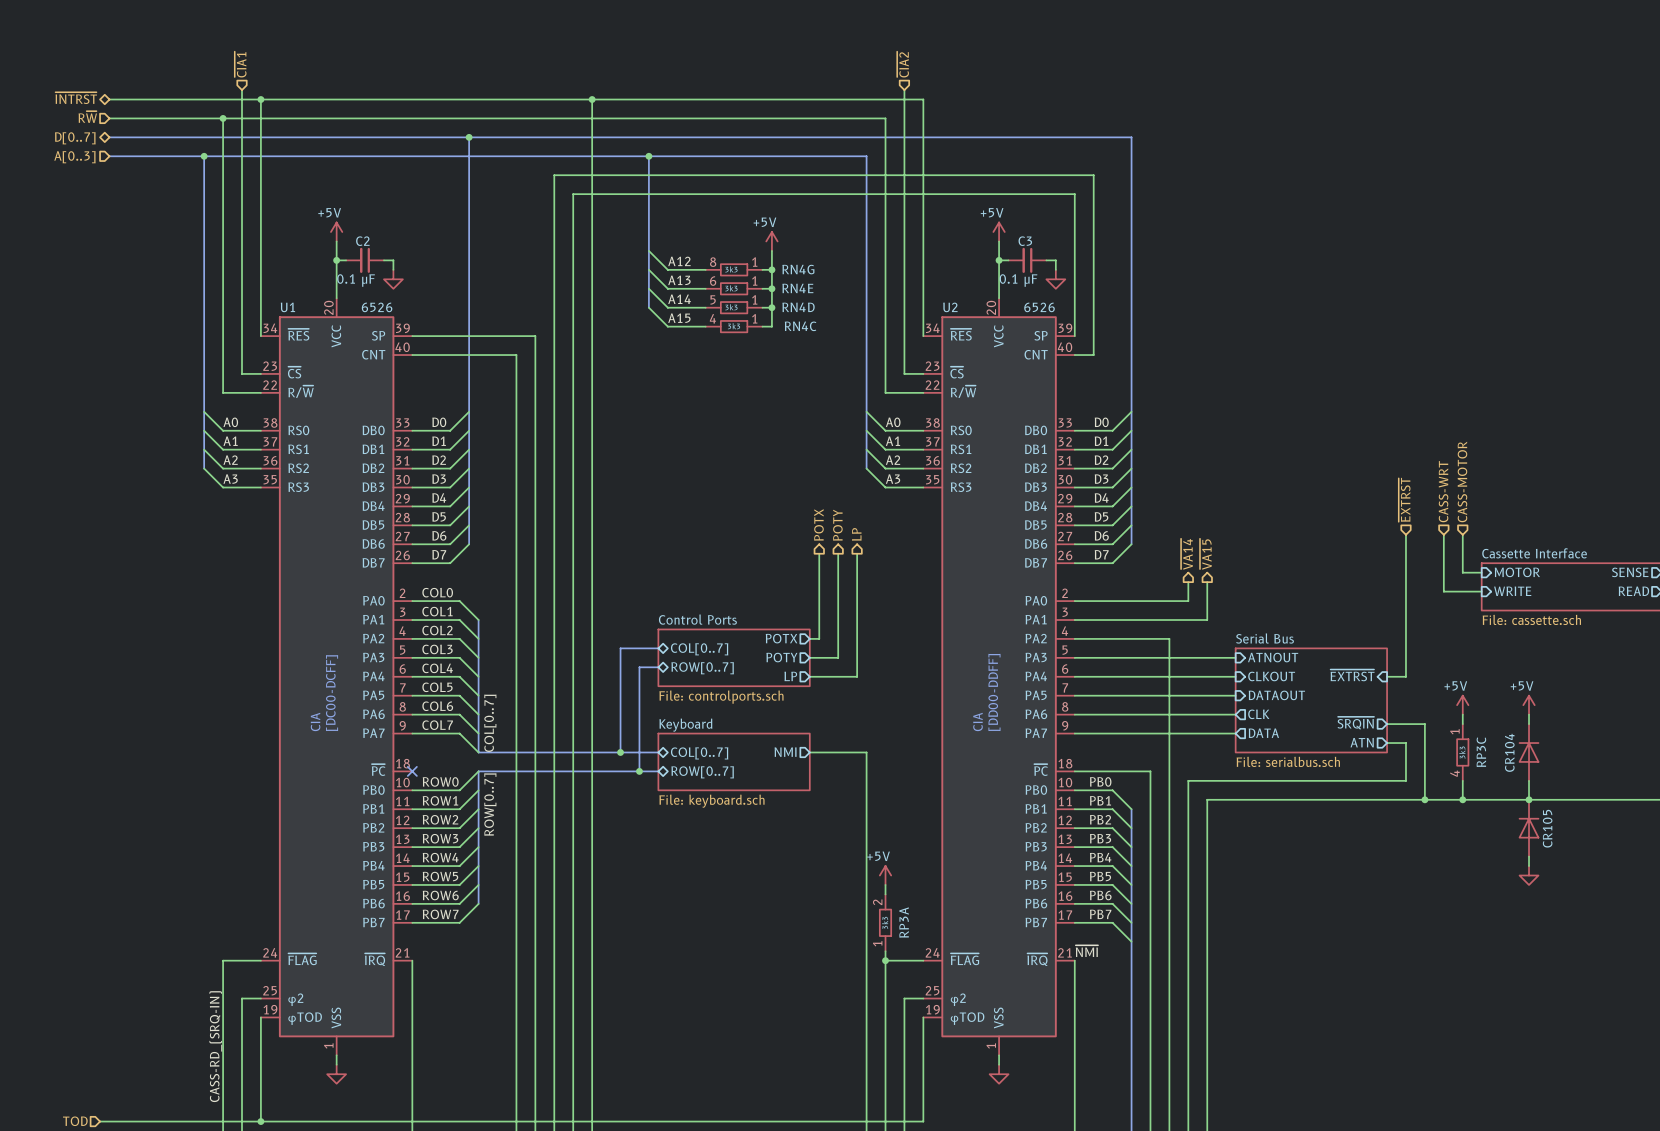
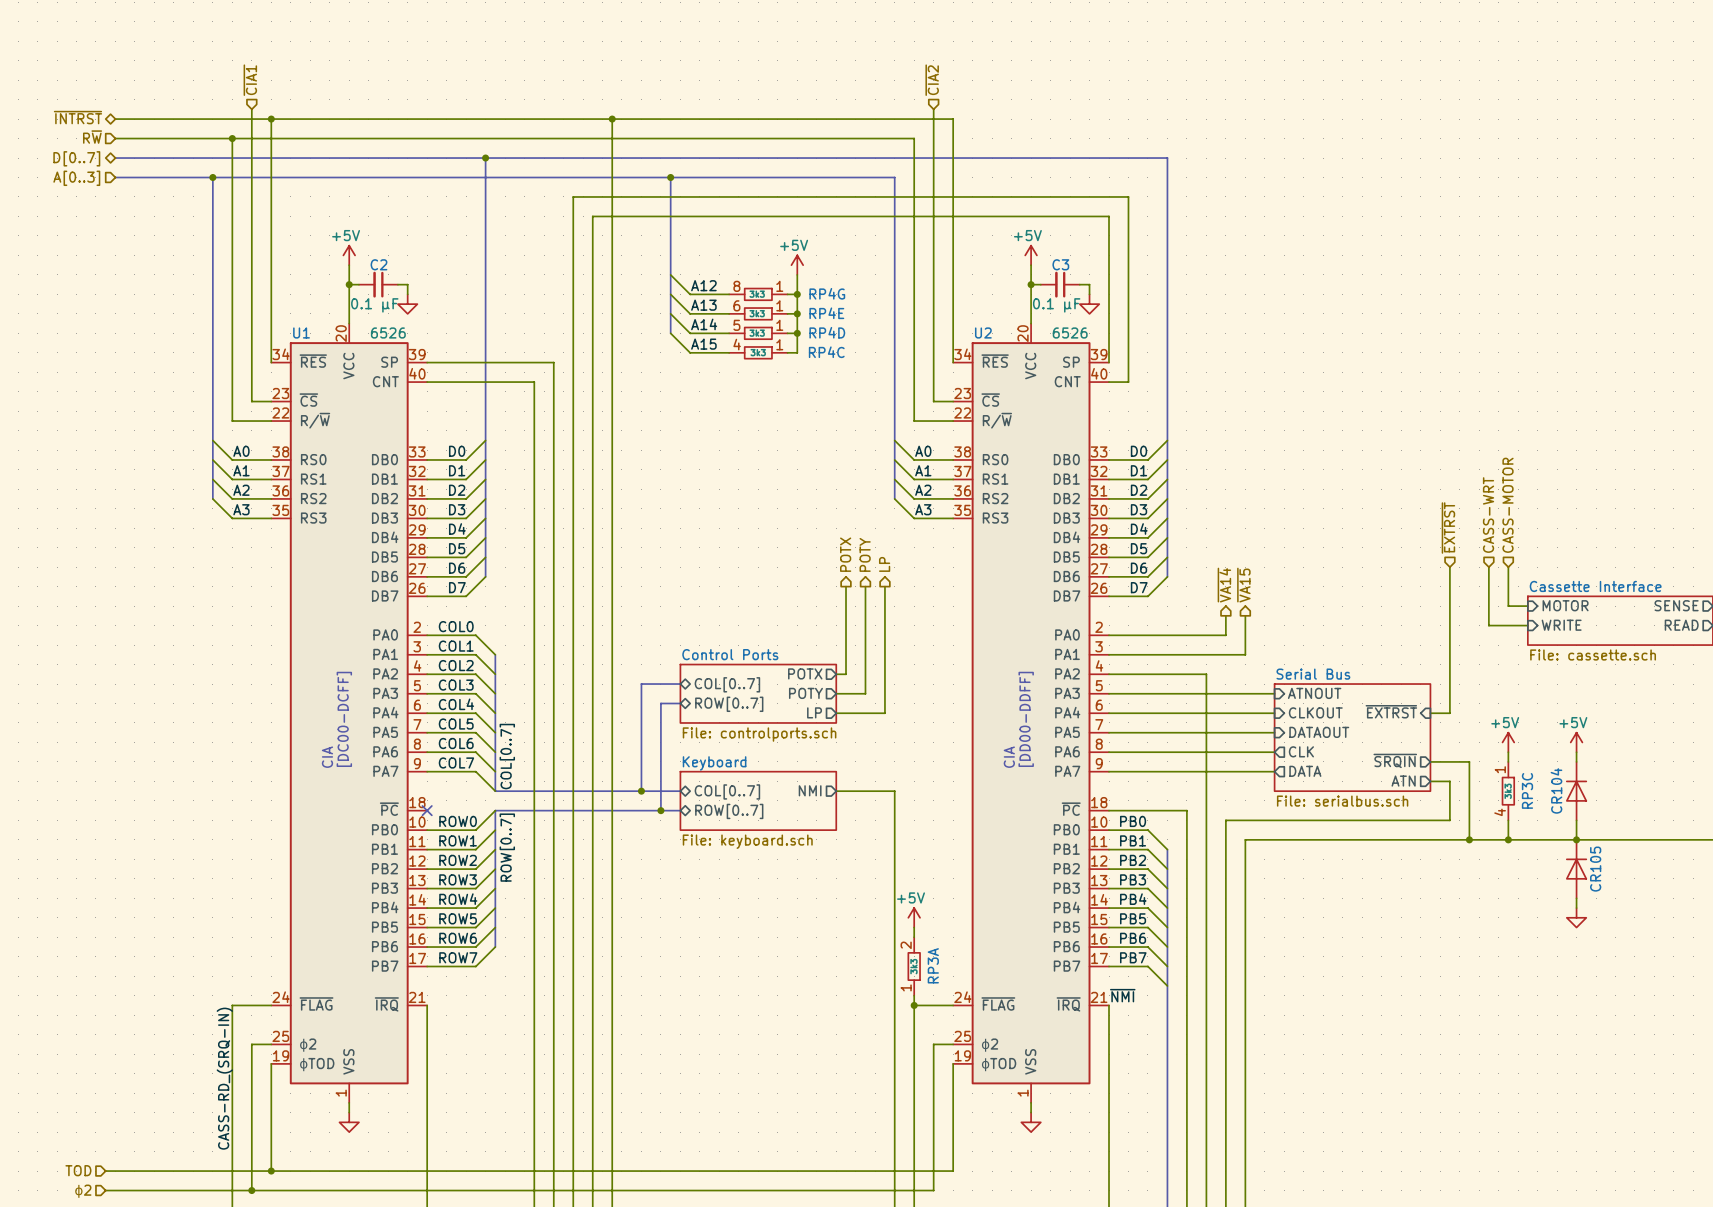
RN4G name: RN4G (798, 269) -> RP4G (827, 293)
RN4E name: RN4E (797, 288) -> RP4E (826, 313)
RN4D name: RN4D (798, 307) -> RP4D (827, 332)
RN4C name: RN4C (800, 326) -> RP4C (826, 352)

